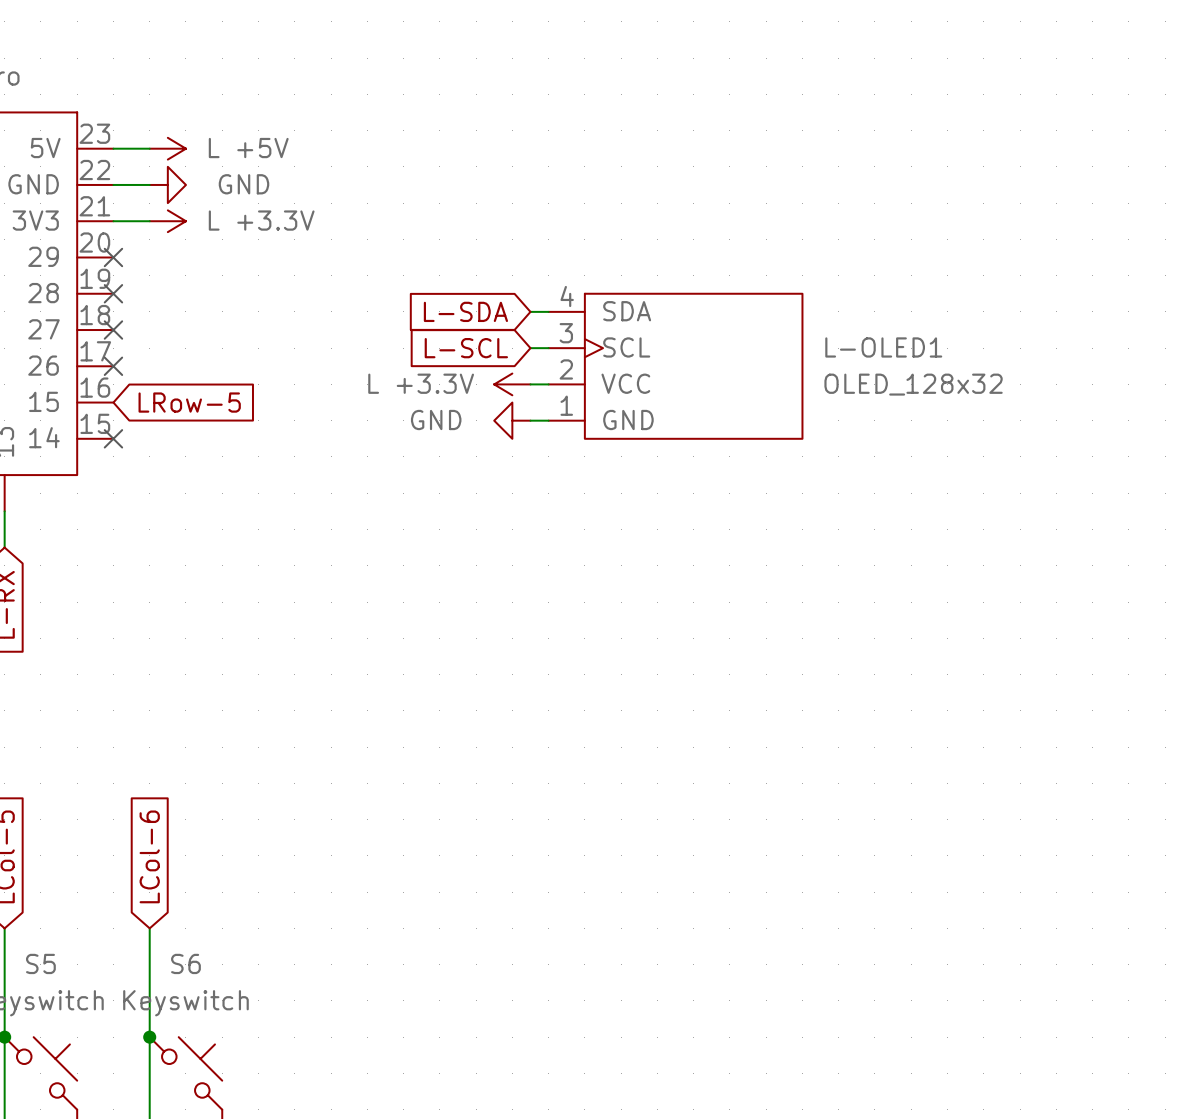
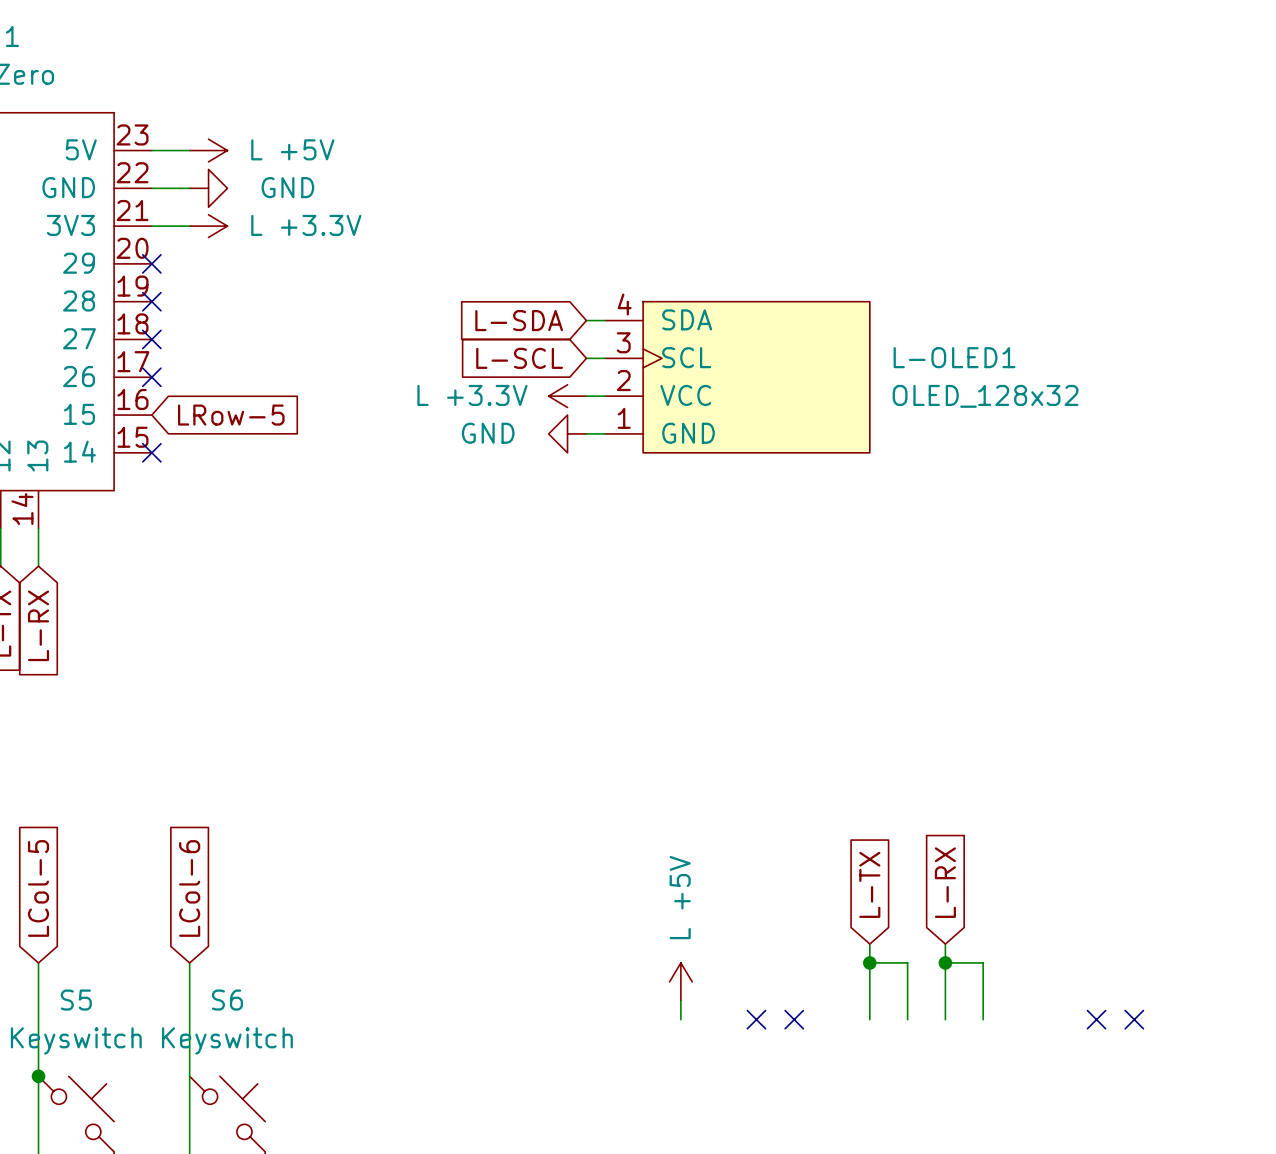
global label: none -> L-RX (945, 882)
global label: none -> L-TX (869, 884)
wire: none -> (869, 944) (869, 1019)
wire: none -> (945, 944) (945, 1019)
wire: none -> (869, 962) (907, 962) (907, 1019)
junction: none -> (869, 962)
wire: none -> (945, 962) (983, 962) (983, 1019)
junction: none -> (945, 962)
power symbol: none -> L +5V (680, 981)
wire: none -> (680, 1000) (680, 1019)
no-connect mark: none -> (756, 1019)
no-connect mark: none -> (794, 1019)
no-connect mark: none -> (1096, 1019)
no-connect mark: none -> (1134, 1019)
junction: (149, 1037) -> none

